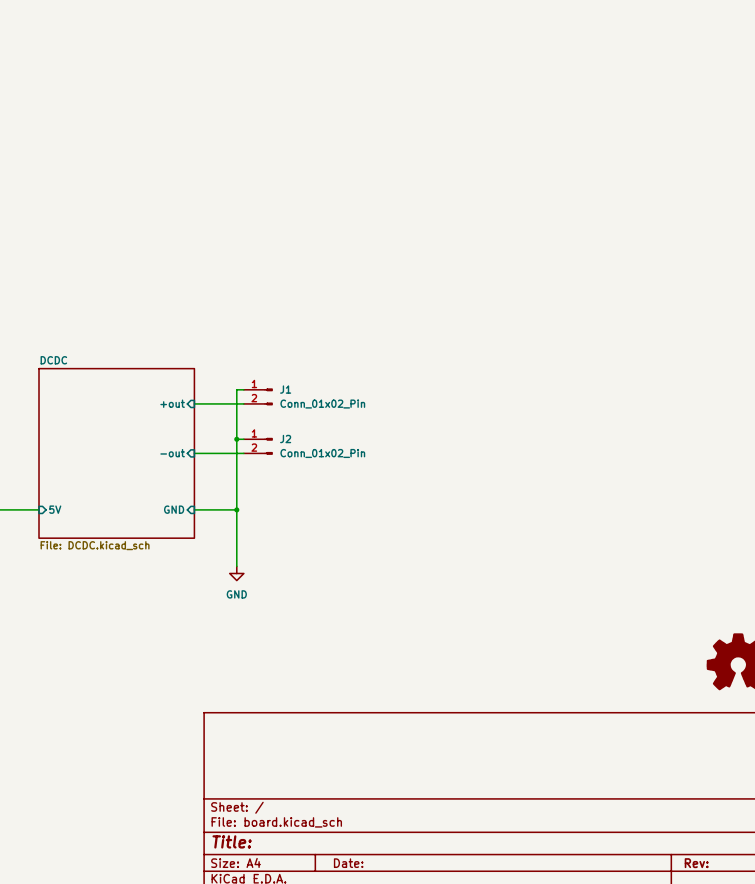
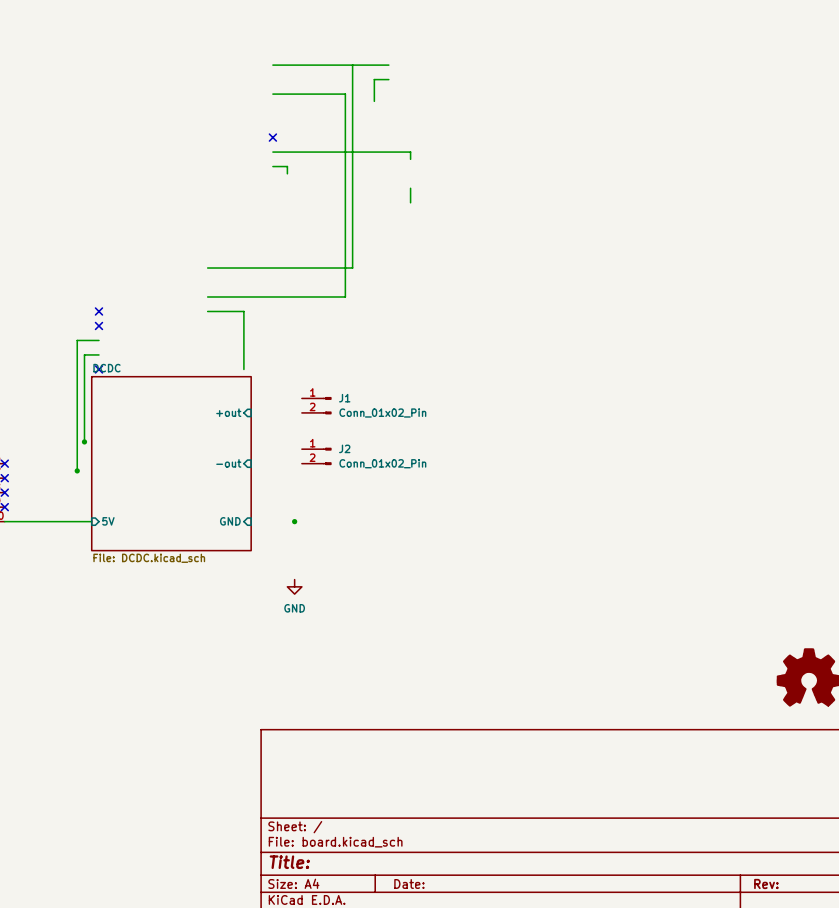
wire: none -> (272, 65) (388, 65)
wire: none -> (352, 65) (352, 268) (207, 268)
wire: none -> (388, 79) (374, 79) (374, 101)
wire: none -> (272, 94) (345, 94) (345, 296) (207, 296)
no-connect mark: none -> (272, 137)
wire: none -> (272, 152) (410, 152) (410, 159)
wire: none -> (272, 166) (287, 166) (287, 173)
wire: none -> (410, 188) (410, 202)
no-connect mark: none -> (98, 311)
wire: none -> (207, 311) (243, 311) (243, 369)
no-connect mark: none -> (98, 325)
wire: none -> (98, 340) (77, 340) (77, 470)
wire: none -> (98, 354) (84, 354) (84, 441)
no-connect mark: none -> (98, 369)
wire: (243, 389) (236, 389) (236, 566) -> none
wire: (194, 403) (243, 403) -> none
junction: none -> (84, 441)
wire: (236, 439) (243, 439) -> none
junction: (236, 439) -> none
wire: (194, 453) (243, 453) -> none
junction: none -> (77, 470)
wire: (194, 509) (236, 509) -> none

